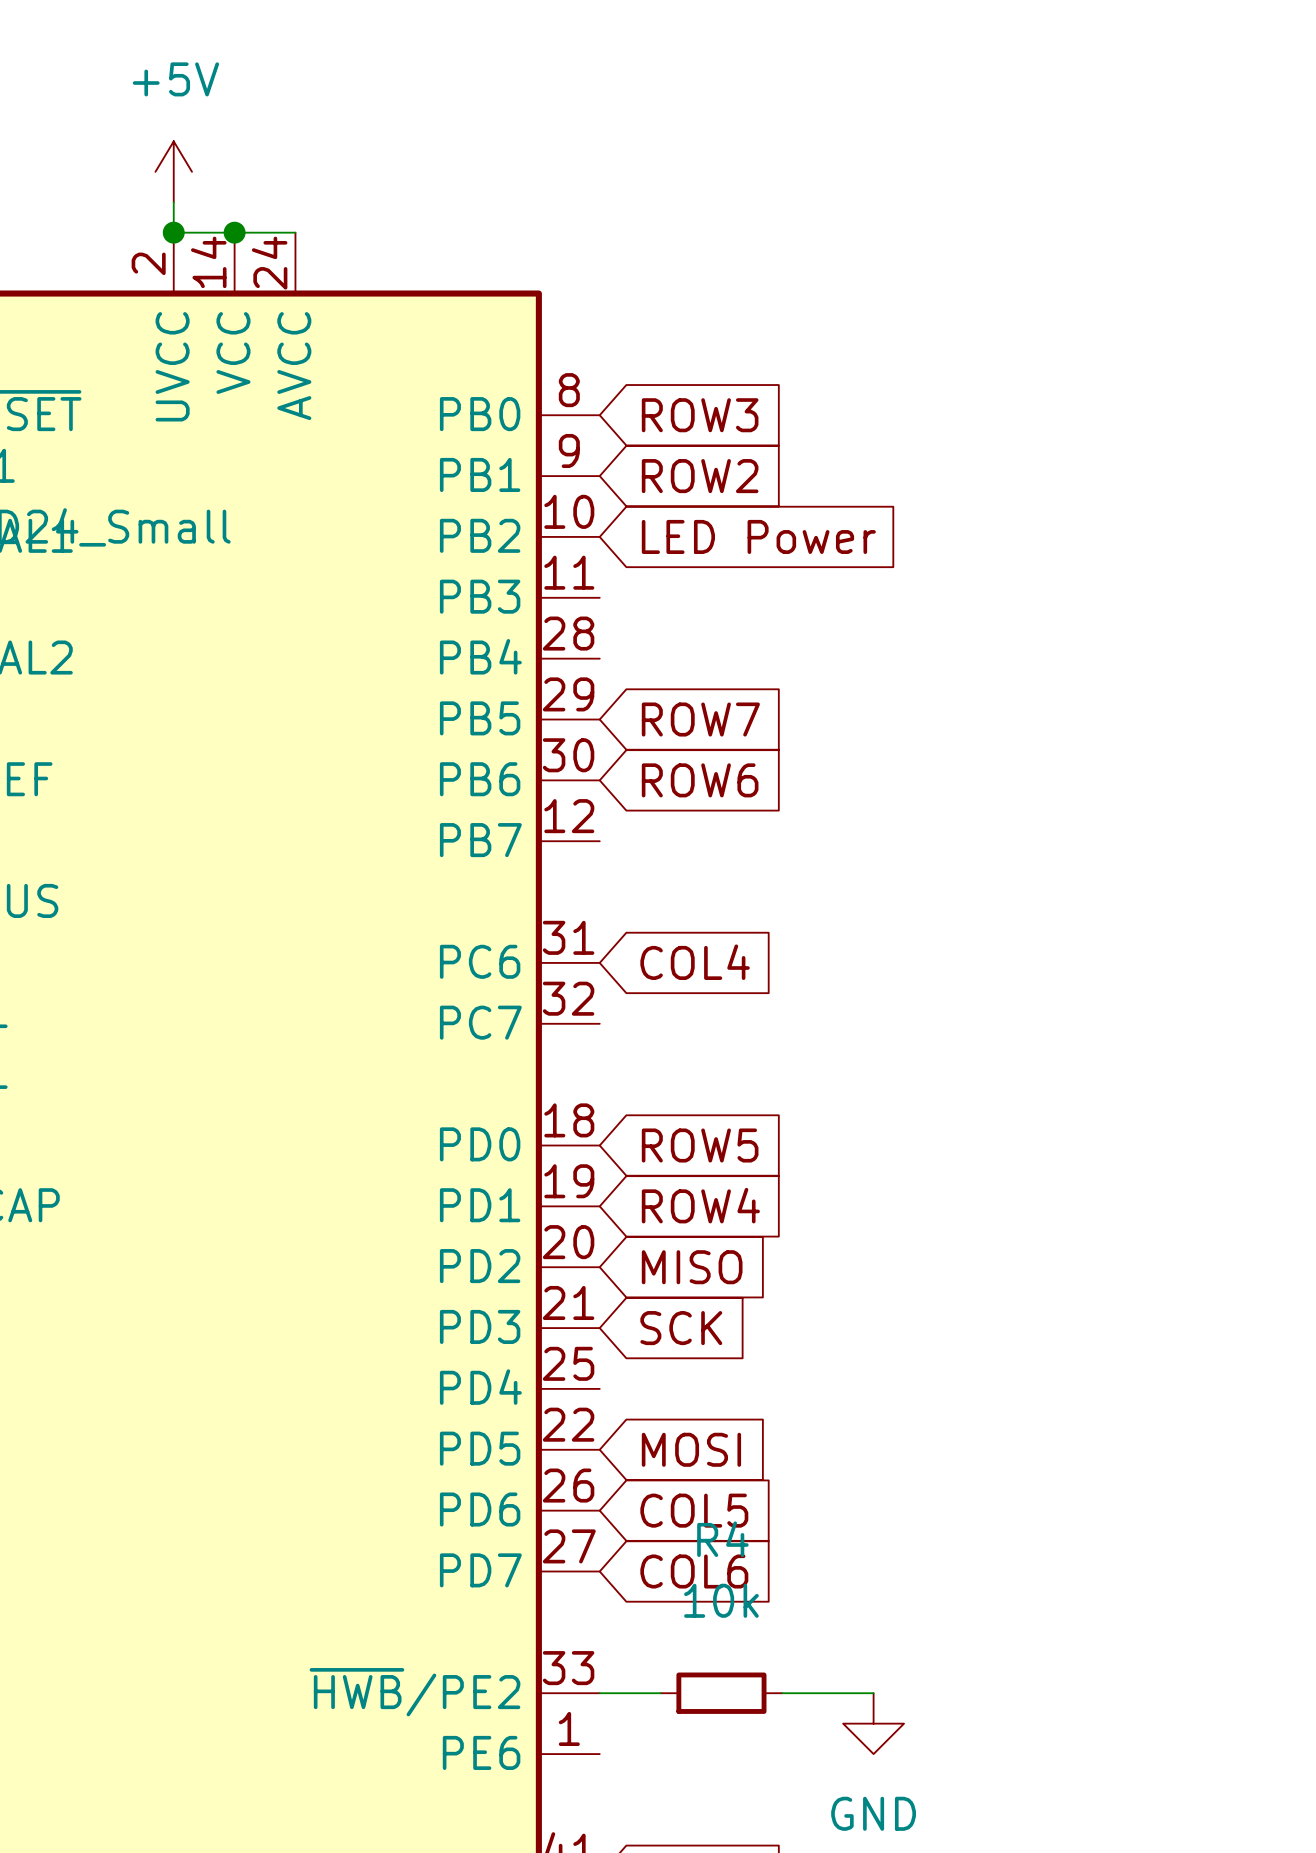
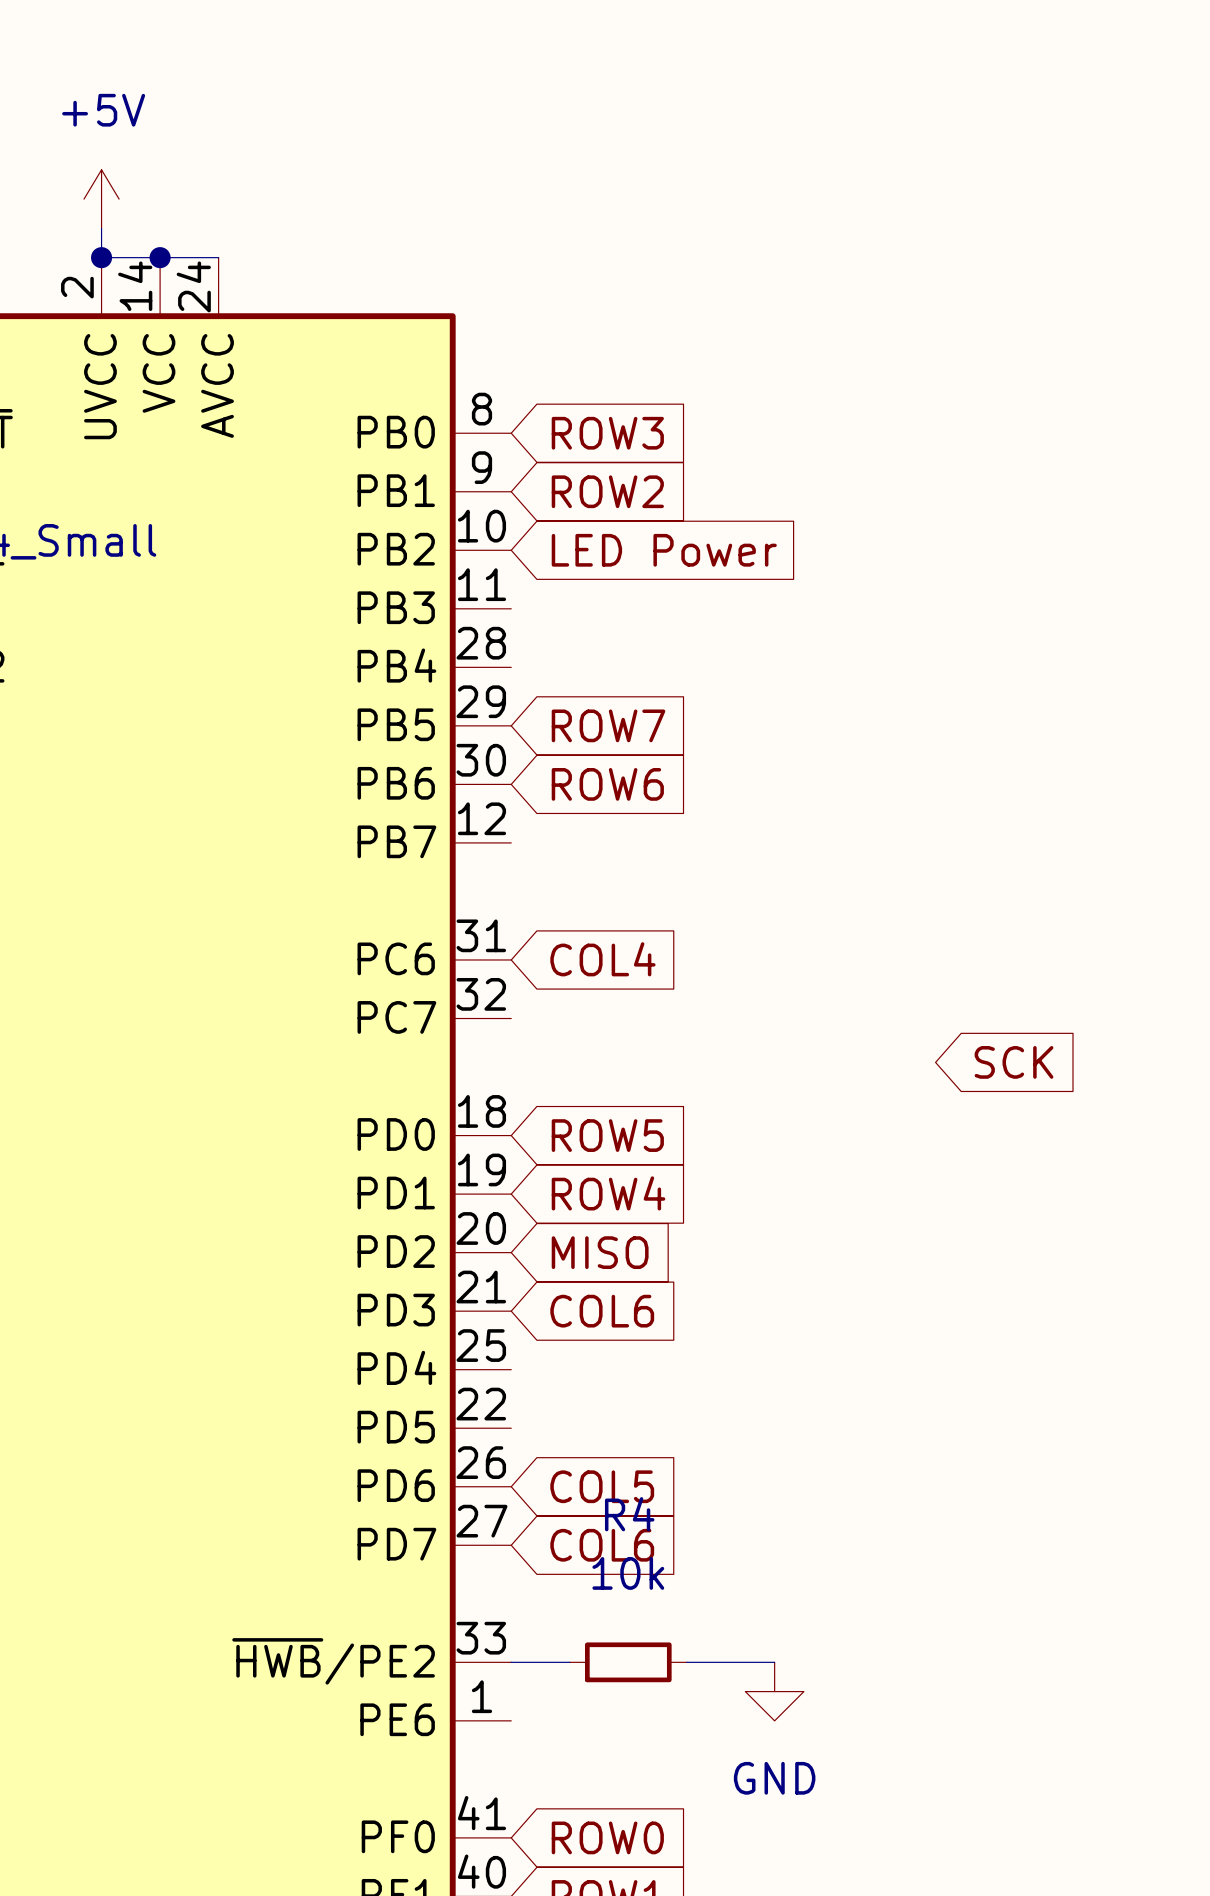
global label: none -> SCK (1014, 1062)
global label: SCK (681, 1328) -> COL6 (602, 1311)
global label: MOSI (691, 1449) -> none

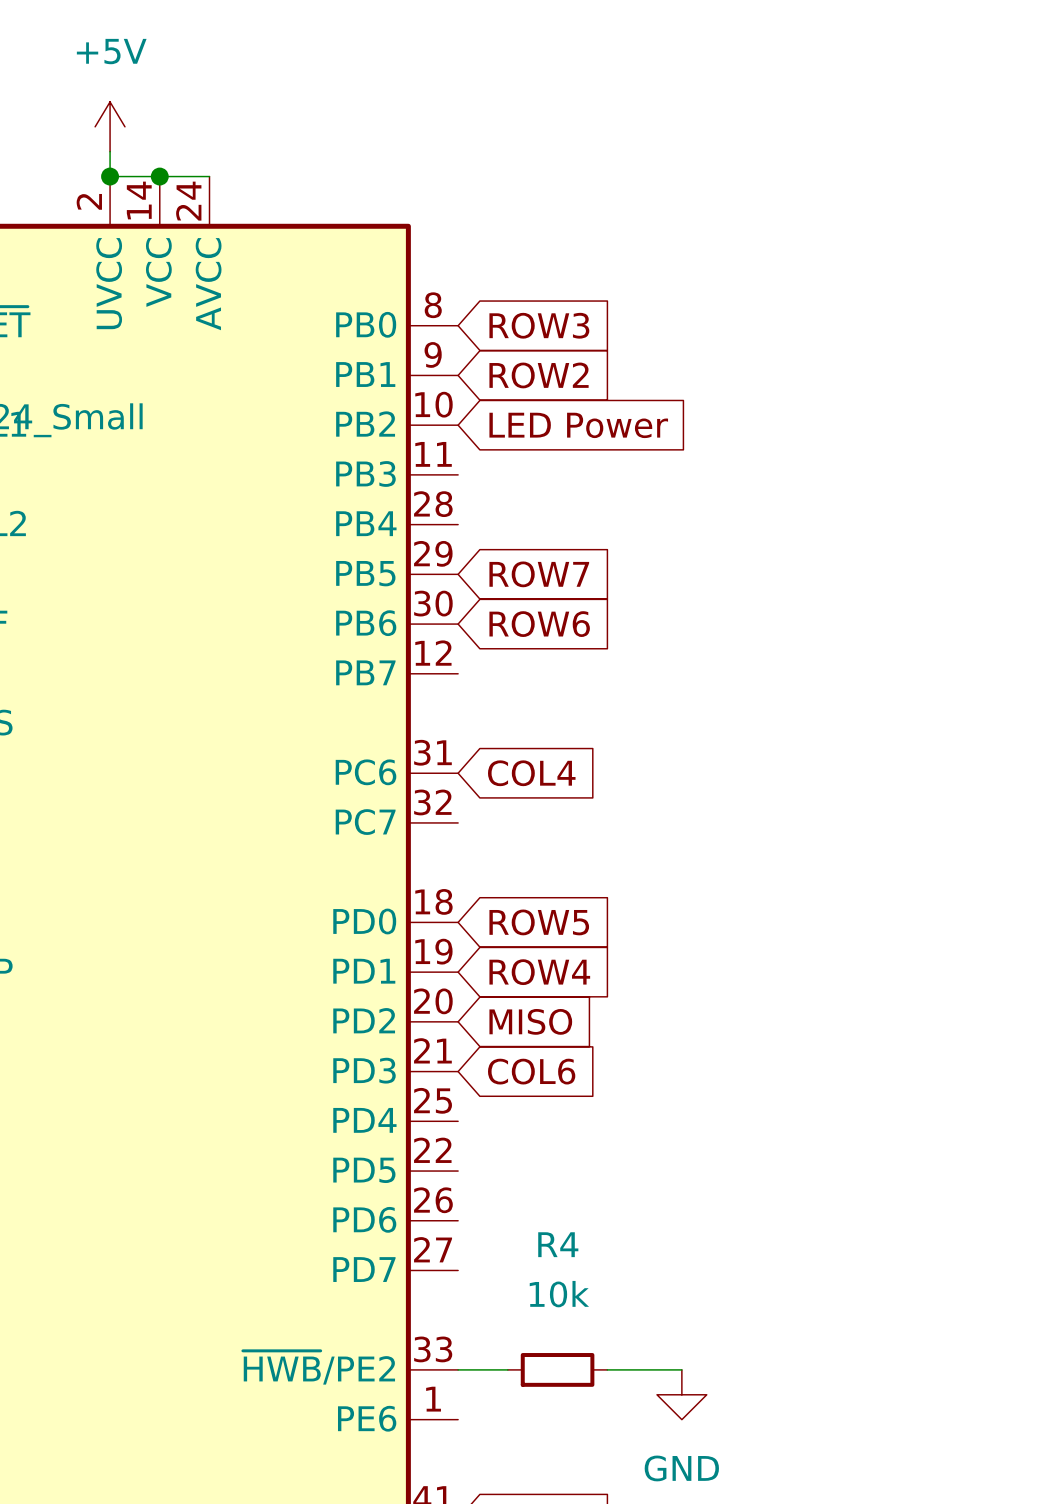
global label: SCK (1014, 1062) -> none
global label: COL5 (602, 1486) -> none
global label: COL6 (602, 1545) -> none

